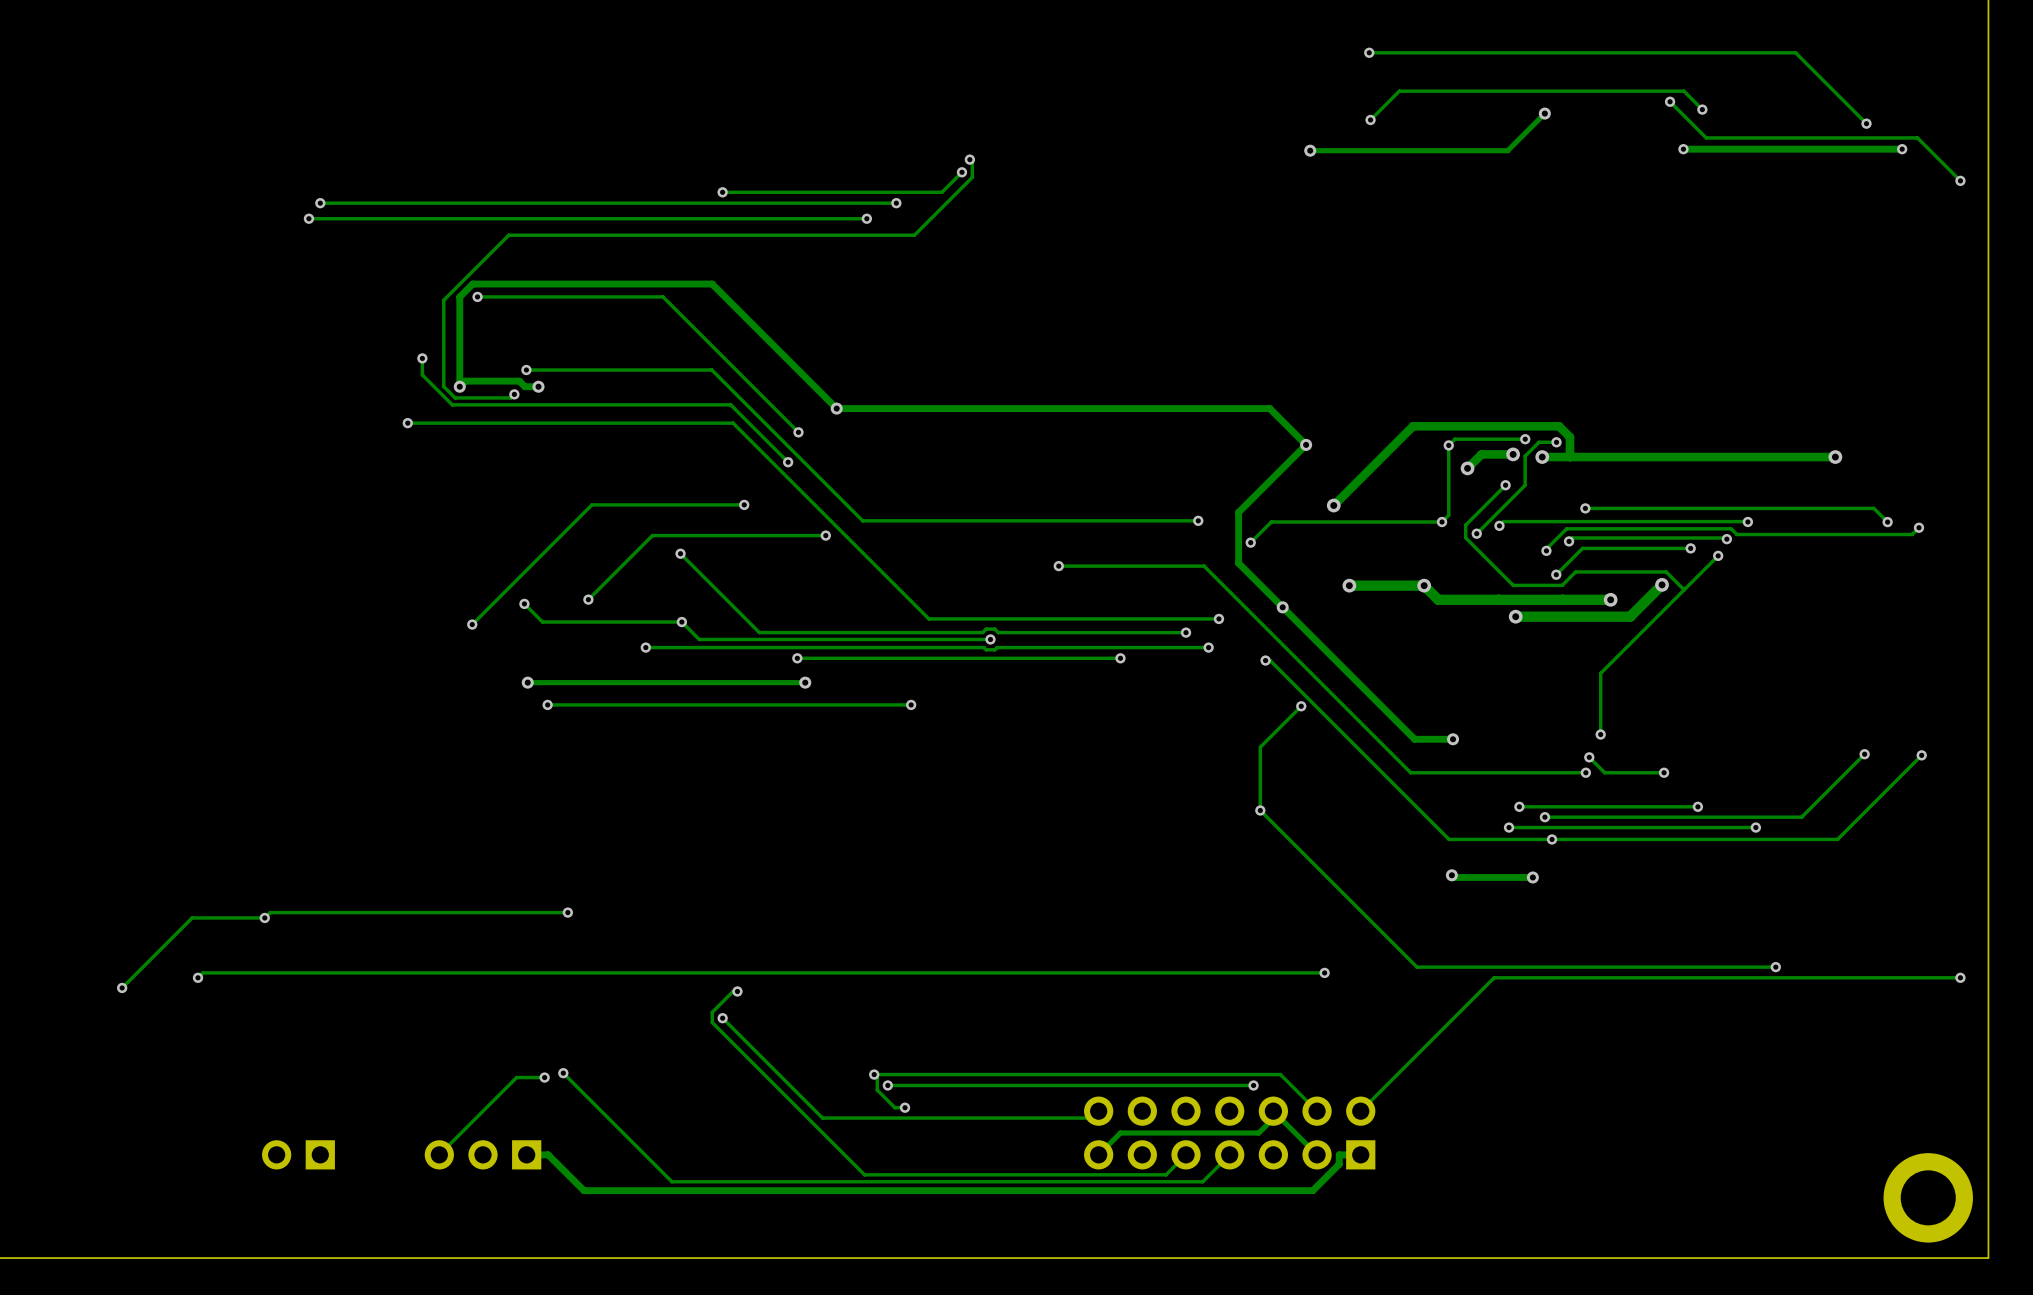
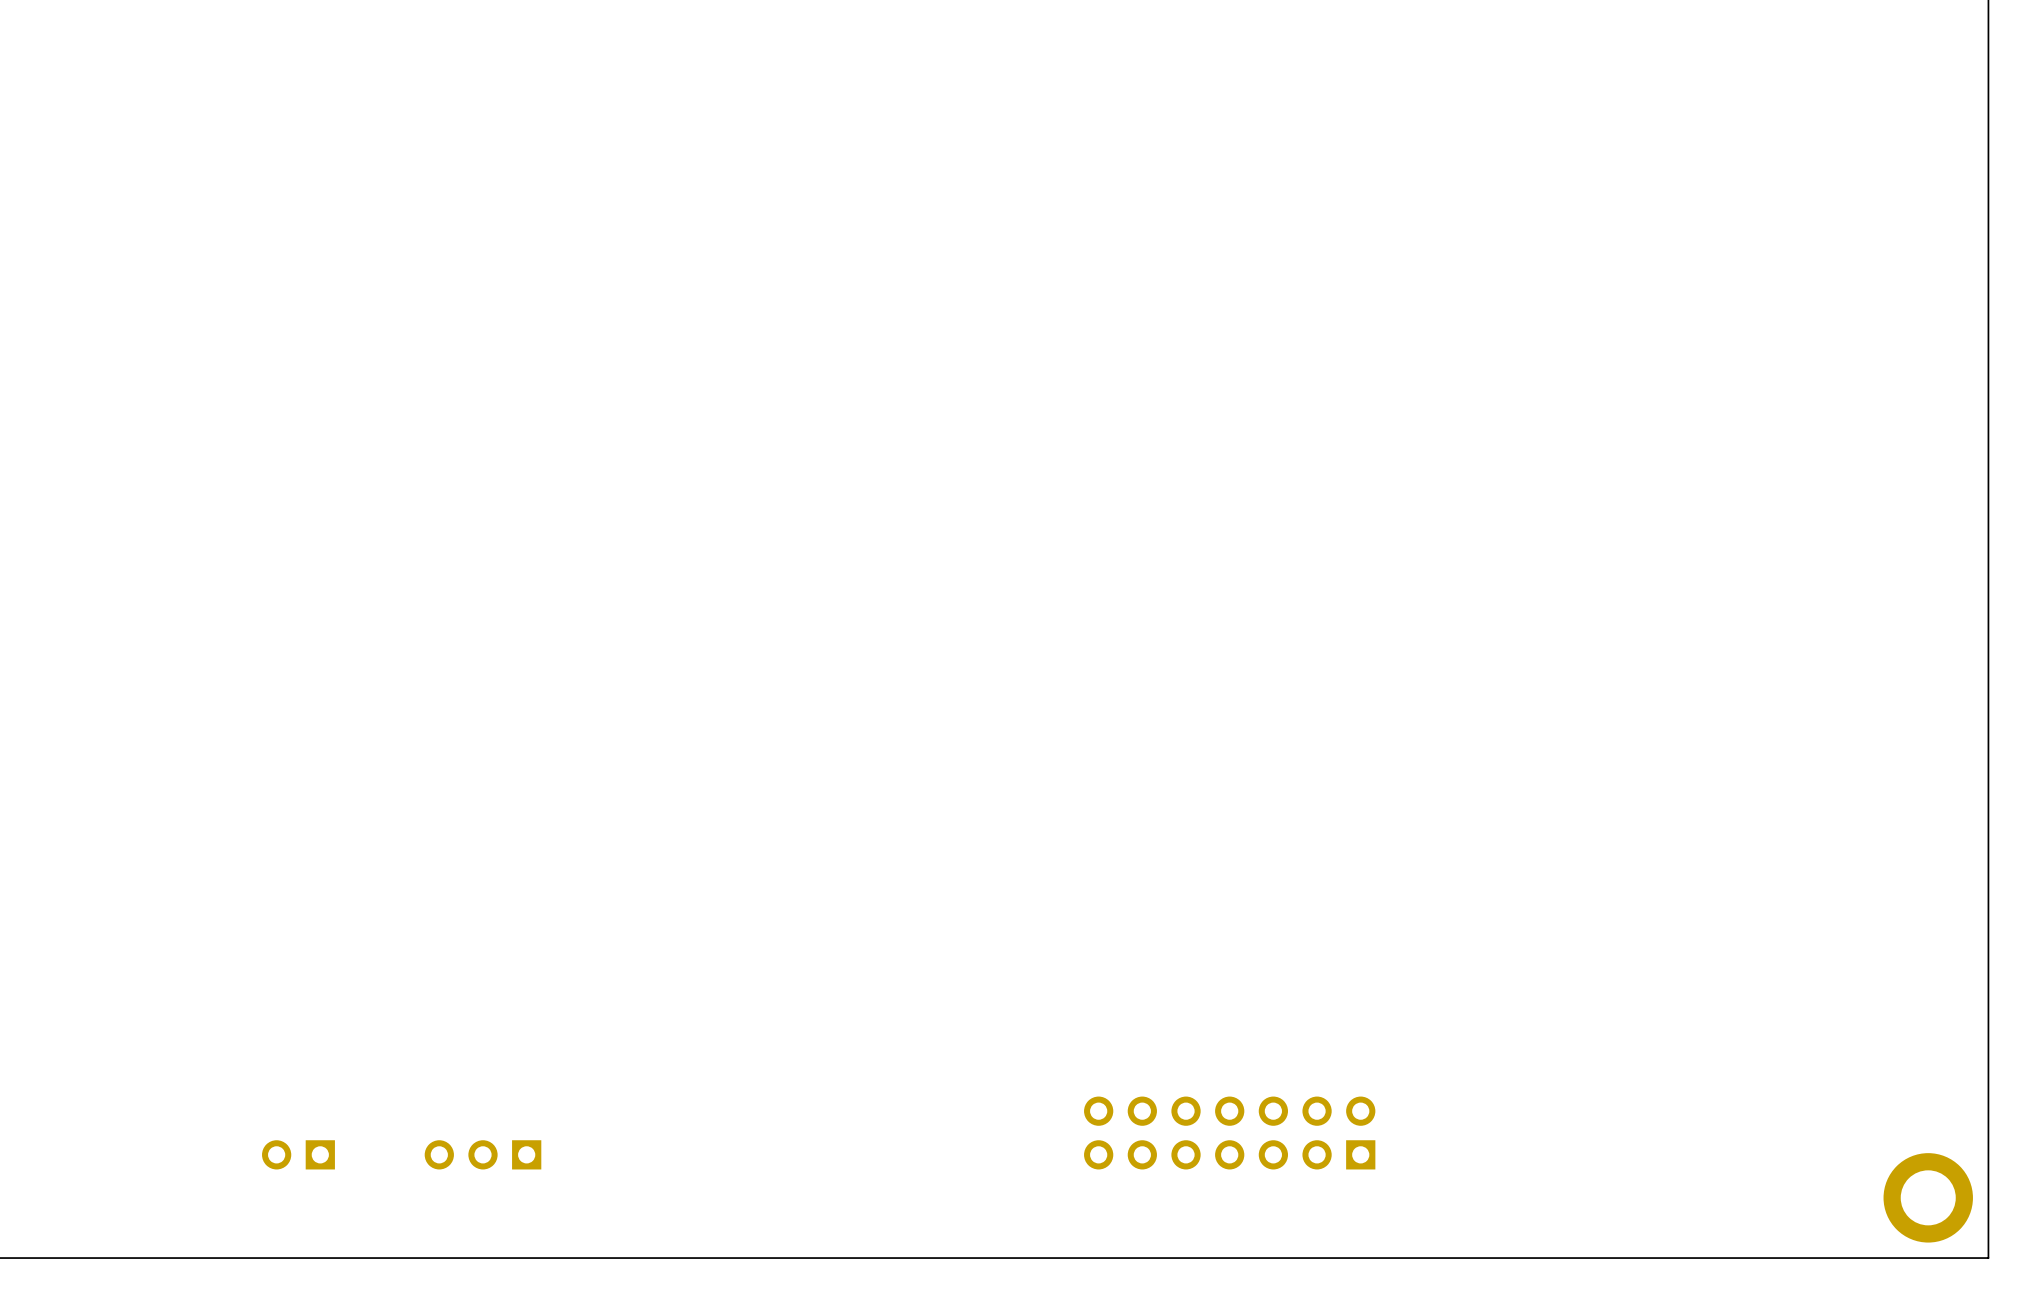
track: (1369, 52) (1795, 52) (1866, 123) -> none
via: (1369, 52) -> none
track: (1670, 101) (1706, 137) (1917, 137) (1960, 180) -> none
via: (1670, 101) -> none
track: (1702, 109) (1683, 91) (1399, 91) (1370, 119) -> none
via: (1702, 109) -> none
track: (1544, 113) (1507, 150) (1310, 150) -> none
via: (1544, 113) -> none
via: (1370, 119) -> none
via: (1866, 123) -> none
via: (1683, 149) -> none
track: (1902, 149) (1683, 149) -> none
via: (1902, 149) -> none
via: (1310, 150) -> none
track: (969, 159) (972, 162) (972, 177) (914, 235) (508, 235) (443, 300) (443, 386) (455, 397) (510, 397) (514, 394) -> none
via: (969, 159) -> none
track: (961, 172) (941, 192) (722, 192) -> none
via: (961, 172) -> none
via: (1960, 180) -> none
via: (722, 192) -> none
via: (320, 203) -> none
track: (896, 203) (320, 203) -> none
via: (896, 203) -> none
via: (308, 218) -> none
track: (866, 218) (308, 218) -> none
via: (866, 218) -> none
track: (477, 296) (663, 296) (798, 432) -> none
via: (477, 296) -> none
track: (422, 358) (422, 374) (452, 404) (730, 404) (788, 462) -> none
via: (422, 358) -> none
track: (526, 370) (711, 370) (862, 520) (1198, 520) -> none
via: (526, 370) -> none
via: (459, 386) -> none
track: (538, 386) (524, 386) (519, 381) (465, 381) (459, 386) (459, 297) (472, 284) (712, 284) (836, 408) (1269, 408) (1306, 444) (1238, 512) (1238, 563) (1414, 739) (1453, 739) -> none
via: (538, 386) -> none
via: (514, 394) -> none
via: (836, 408) -> none
track: (407, 423) (733, 423) (928, 618) (1218, 618) -> none
via: (407, 423) -> none
via: (798, 432) -> none
track: (1525, 439) (1454, 439) (1448, 445) (1448, 515) (1442, 521) (1271, 521) (1250, 542) -> none
via: (1525, 439) -> none
track: (1556, 442) (1539, 442) (1525, 456) (1525, 485) (1476, 533) -> none
via: (1556, 442) -> none
via: (1306, 444) -> none
via: (1448, 445) -> none
track: (1513, 454) (1481, 454) (1467, 468) -> none
via: (1513, 454) -> none
via: (1542, 457) -> none
track: (1569, 457) (1569, 437) (1559, 426) (1412, 426) (1333, 505) -> none
track: (1835, 457) (1542, 457) -> none
via: (1835, 457) -> none
via: (788, 462) -> none
via: (1467, 468) -> none
track: (1505, 485) (1465, 525) (1465, 537) (1513, 585) (1562, 585) (1575, 571) (1666, 571) (1684, 589) -> none
via: (1505, 485) -> none
track: (744, 504) (591, 504) (472, 624) -> none
via: (744, 504) -> none
via: (1333, 505) -> none
track: (1585, 508) (1873, 508) (1887, 522) -> none
via: (1585, 508) -> none
via: (1198, 520) -> none
via: (1442, 521) -> none
track: (1747, 521) (1503, 521) (1499, 525) -> none
via: (1747, 521) -> none
via: (1887, 522) -> none
via: (1499, 525) -> none
track: (1919, 527) (1912, 534) (1736, 534) (1731, 528) (1566, 528) (1546, 550) -> none
via: (1919, 527) -> none
via: (1476, 533) -> none
track: (825, 535) (652, 535) (588, 599) -> none
via: (825, 535) -> none
track: (1726, 539) (1572, 537) (1569, 541) -> none
via: (1726, 539) -> none
via: (1569, 541) -> none
via: (1250, 542) -> none
track: (1690, 548) (1582, 548) (1556, 574) -> none
via: (1690, 548) -> none
via: (1546, 550) -> none
track: (680, 553) (759, 632) (982, 632) (986, 629) (994, 629) (998, 632) (1186, 632) -> none
via: (680, 553) -> none
track: (1718, 555) (1600, 673) (1600, 734) -> none
via: (1718, 555) -> none
track: (1058, 566) (1204, 566) (1410, 772) (1585, 772) -> none
via: (1058, 566) -> none
via: (1556, 574) -> none
track: (1662, 584) (1630, 616) (1515, 616) -> none
via: (1662, 584) -> none
track: (1349, 585) (1424, 585) (1438, 599) (1498, 599) -> none
via: (1349, 585) -> none
via: (1424, 585) -> none
via: (588, 599) -> none
track: (1562, 599) (1498, 599) -> none
track: (1610, 599) (1562, 599) -> none
via: (1610, 599) -> none
track: (524, 603) (542, 622) (681, 622) (699, 639) (990, 639) -> none
via: (524, 603) -> none
via: (1282, 607) -> none
via: (1515, 616) -> none
via: (1218, 618) -> none
via: (681, 622) -> none
via: (472, 624) -> none
via: (1186, 632) -> none
via: (990, 639) -> none
via: (645, 647) -> none
track: (1208, 647) (997, 647) (994, 649) (986, 649) (983, 647) (645, 647) -> none
via: (1208, 647) -> none
via: (797, 658) -> none
track: (1120, 658) (797, 658) -> none
via: (1120, 658) -> none
track: (1265, 660) (1270, 660) (1449, 839) (1837, 839) (1921, 755) -> none
via: (1265, 660) -> none
via: (527, 682) -> none
track: (805, 682) (527, 682) -> none
via: (805, 682) -> none
via: (547, 704) -> none
track: (911, 704) (547, 704) -> none
via: (911, 704) -> none
track: (1301, 706) (1260, 747) (1260, 810) (1416, 967) (1775, 967) -> none
via: (1301, 706) -> none
via: (1600, 734) -> none
via: (1453, 739) -> none
track: (1864, 754) (1801, 817) (1544, 817) -> none
via: (1864, 754) -> none
via: (1921, 755) -> none
track: (1589, 757) (1604, 772) (1664, 772) -> none
via: (1589, 757) -> none
via: (1585, 772) -> none
via: (1664, 772) -> none
via: (1519, 806) -> none
track: (1697, 806) (1519, 806) -> none
via: (1697, 806) -> none
via: (1260, 810) -> none
via: (1544, 817) -> none
via: (1509, 827) -> none
track: (1755, 827) (1509, 827) -> none
via: (1755, 827) -> none
via: (1552, 839) -> none
track: (1451, 875) (1454, 877) (1532, 877) -> none
via: (1451, 875) -> none
via: (1532, 877) -> none
track: (567, 912) (270, 912) (264, 917) (192, 917) (122, 987) -> none
via: (567, 912) -> none
via: (264, 917) -> none
via: (1775, 967) -> none
track: (1324, 972) (202, 972) (198, 977) -> none
via: (1324, 972) -> none
via: (198, 977) -> none
track: (1960, 977) (1494, 977) (1360, 1111) -> none
via: (1960, 977) -> none
via: (122, 987) -> none
track: (737, 991) (733, 991) (712, 1012) (712, 1022) (864, 1174) (1166, 1174) (1186, 1154) -> none
via: (737, 991) -> none
track: (722, 1018) (822, 1118) (1091, 1118) (1098, 1111) -> none
via: (722, 1018) -> none
track: (563, 1073) (671, 1181) (1202, 1181) (1229, 1154) -> none
via: (563, 1073) -> none
track: (874, 1074) (1280, 1074) (1317, 1111) -> none
via: (874, 1074) -> none
track: (877, 1074) (877, 1090) (894, 1107) (905, 1107) -> none
track: (544, 1077) (516, 1077) (439, 1154) -> none
via: (544, 1077) -> none
via: (887, 1085) -> none
track: (1253, 1085) (887, 1085) -> none
via: (1253, 1085) -> none
via: (905, 1107) -> none
track: (1273, 1118) (1280, 1118) (1317, 1154) -> none
track: (1273, 1118) (1258, 1133) (1120, 1133) (1098, 1154) -> none
track: (1360, 1154) (1339, 1154) (1339, 1164) (1312, 1190) (584, 1190) (548, 1154) (526, 1154) -> none

